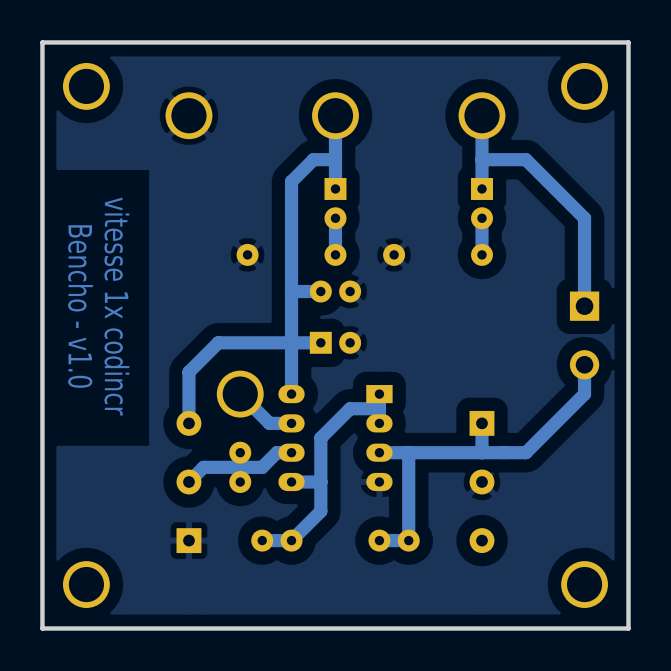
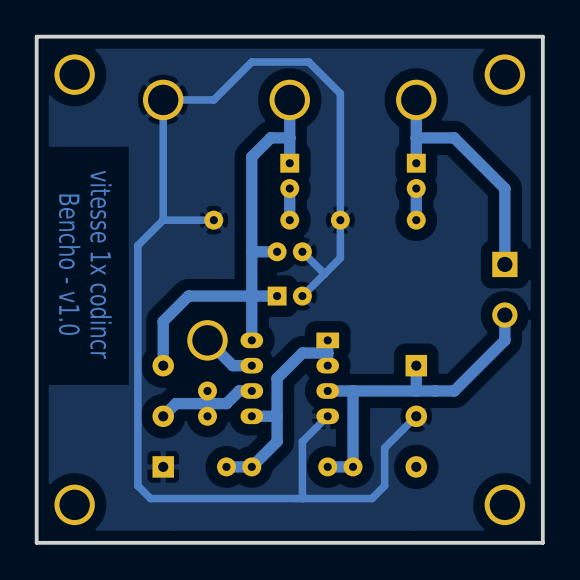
track: none -> (163, 220) (137, 245) (137, 485) (150, 498) (372, 498) (384, 485) (384, 447) (416, 416)
track: none -> (163, 220) (163, 99) (213, 99) (251, 61) (308, 61) (340, 93) (340, 258) (302, 296)
track: none -> (213, 220) (163, 220)
track: none -> (302, 251) (324, 273)
track: none -> (327, 416) (302, 441) (302, 498)

